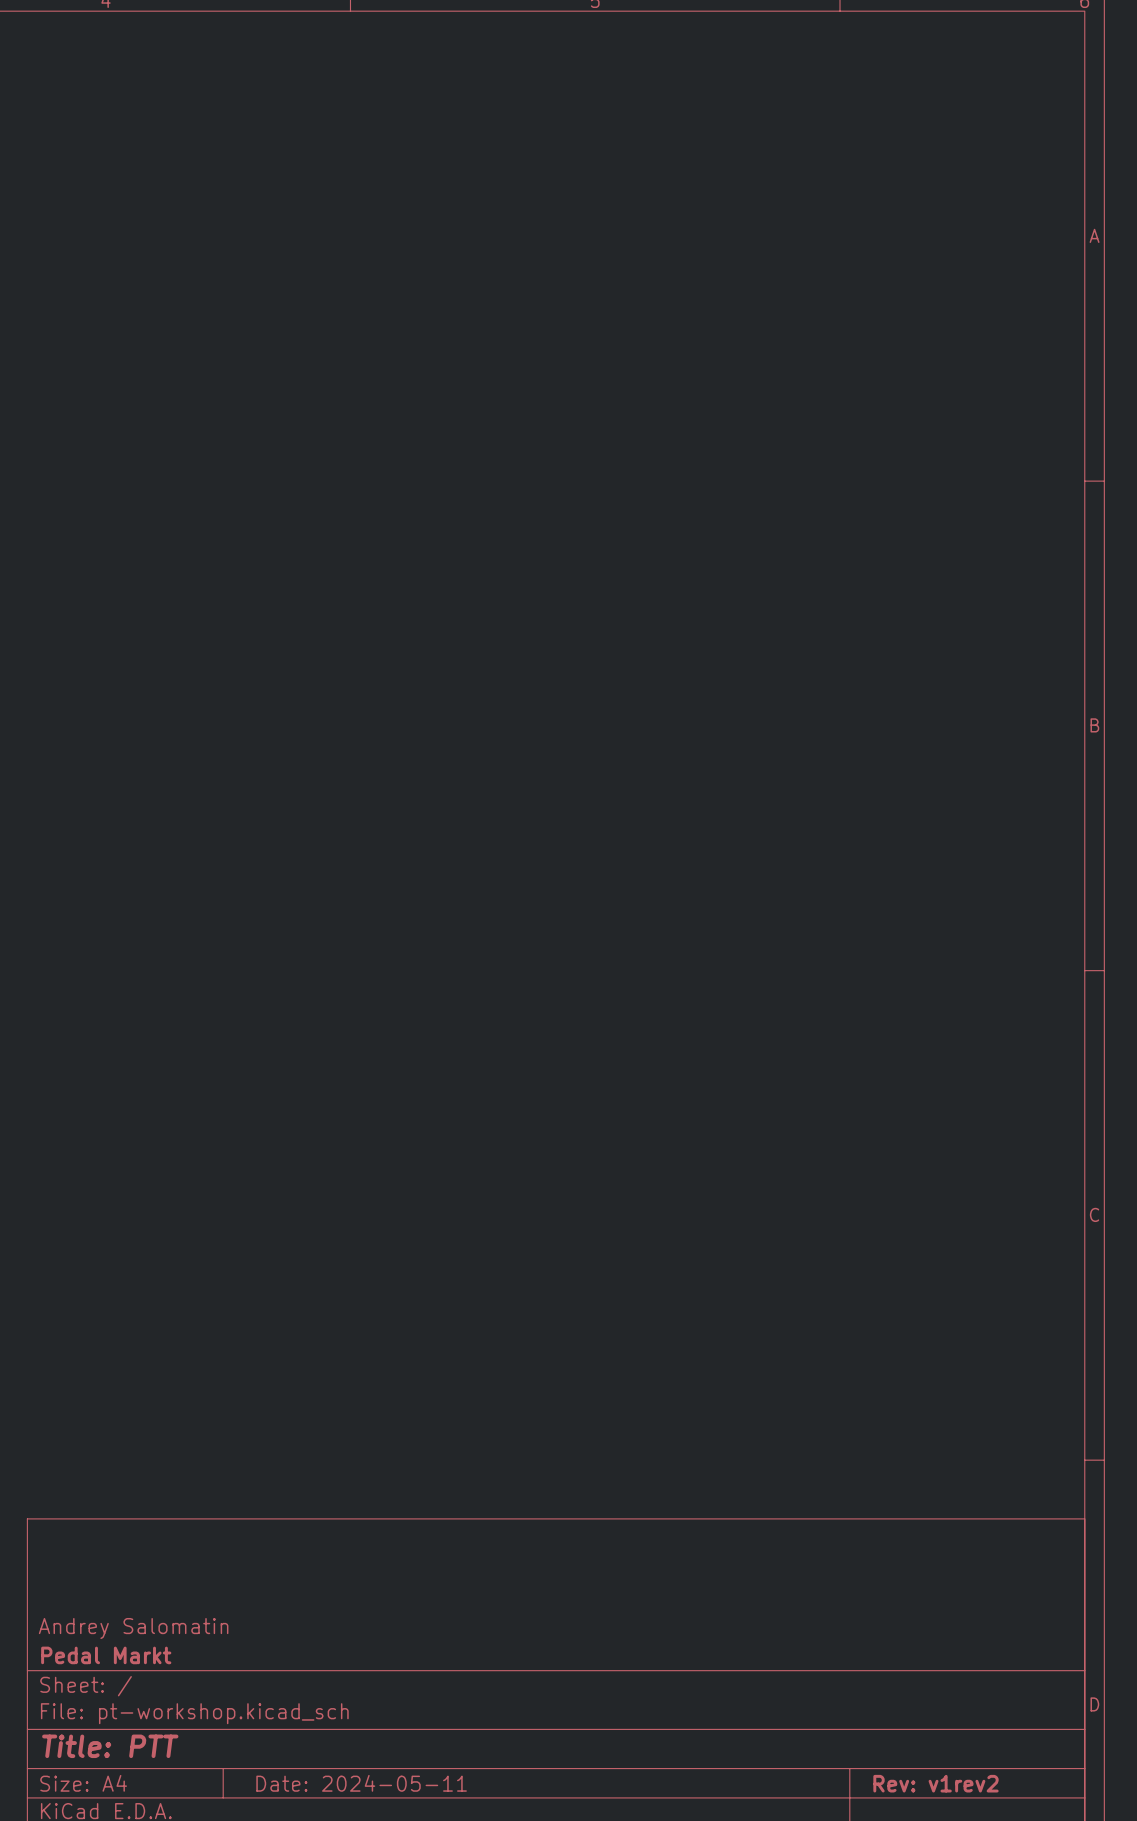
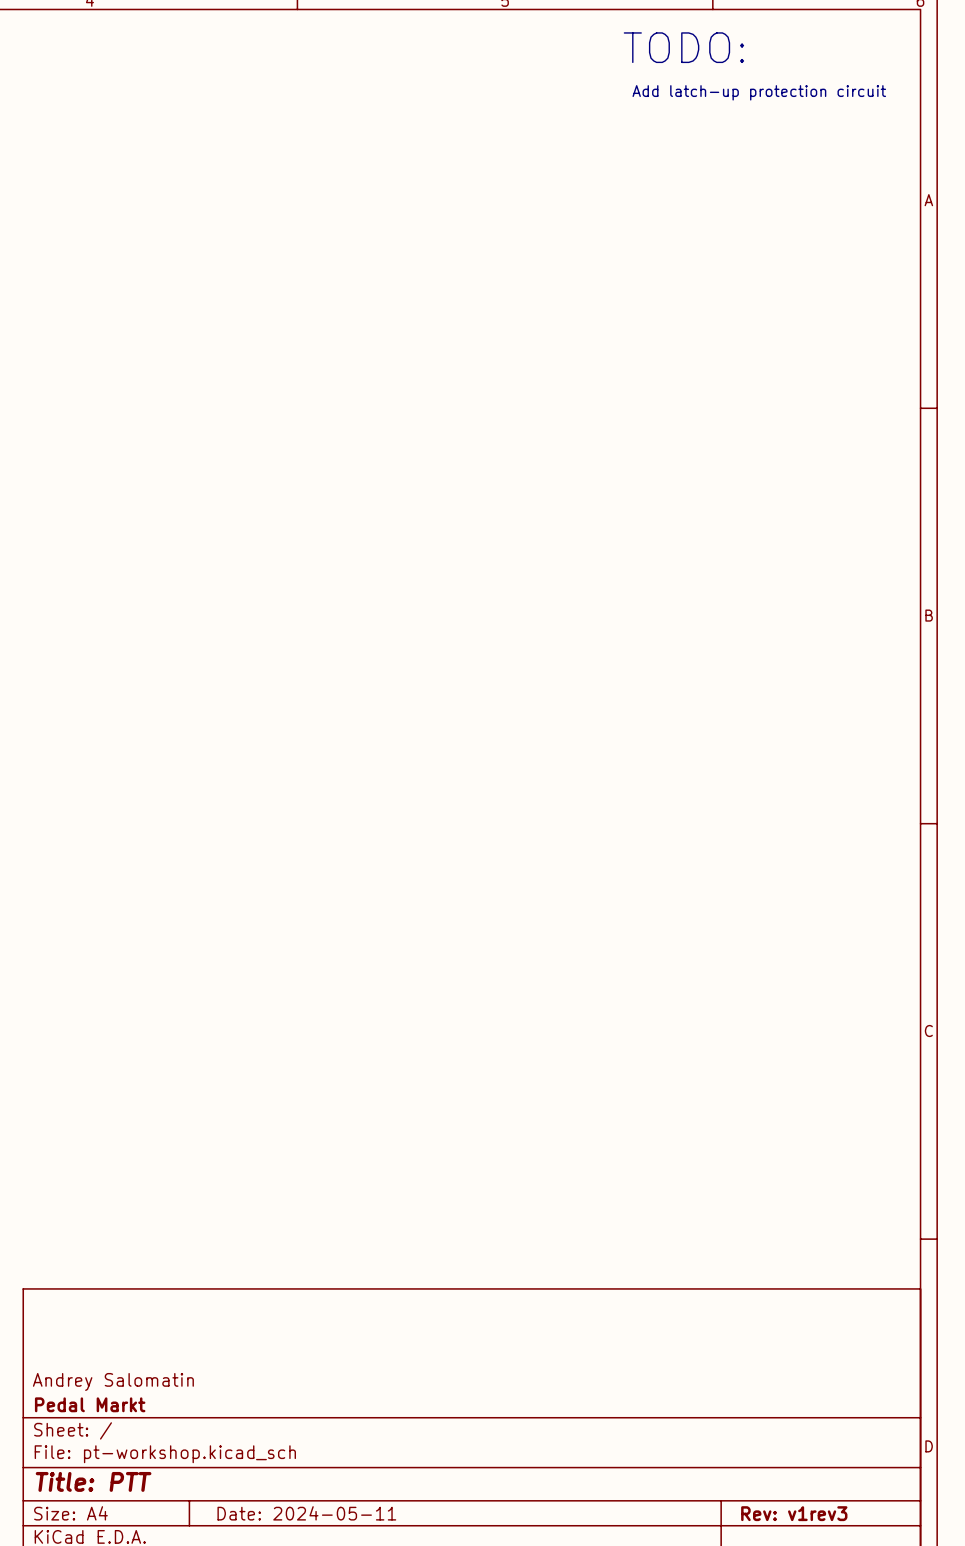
text: none -> TODO: (683, 47)
text: none -> Add latch-up protection circuit (759, 92)
title block: Rev: v1rev2 (935, 1783) -> Rev: v1rev3 (794, 1513)

